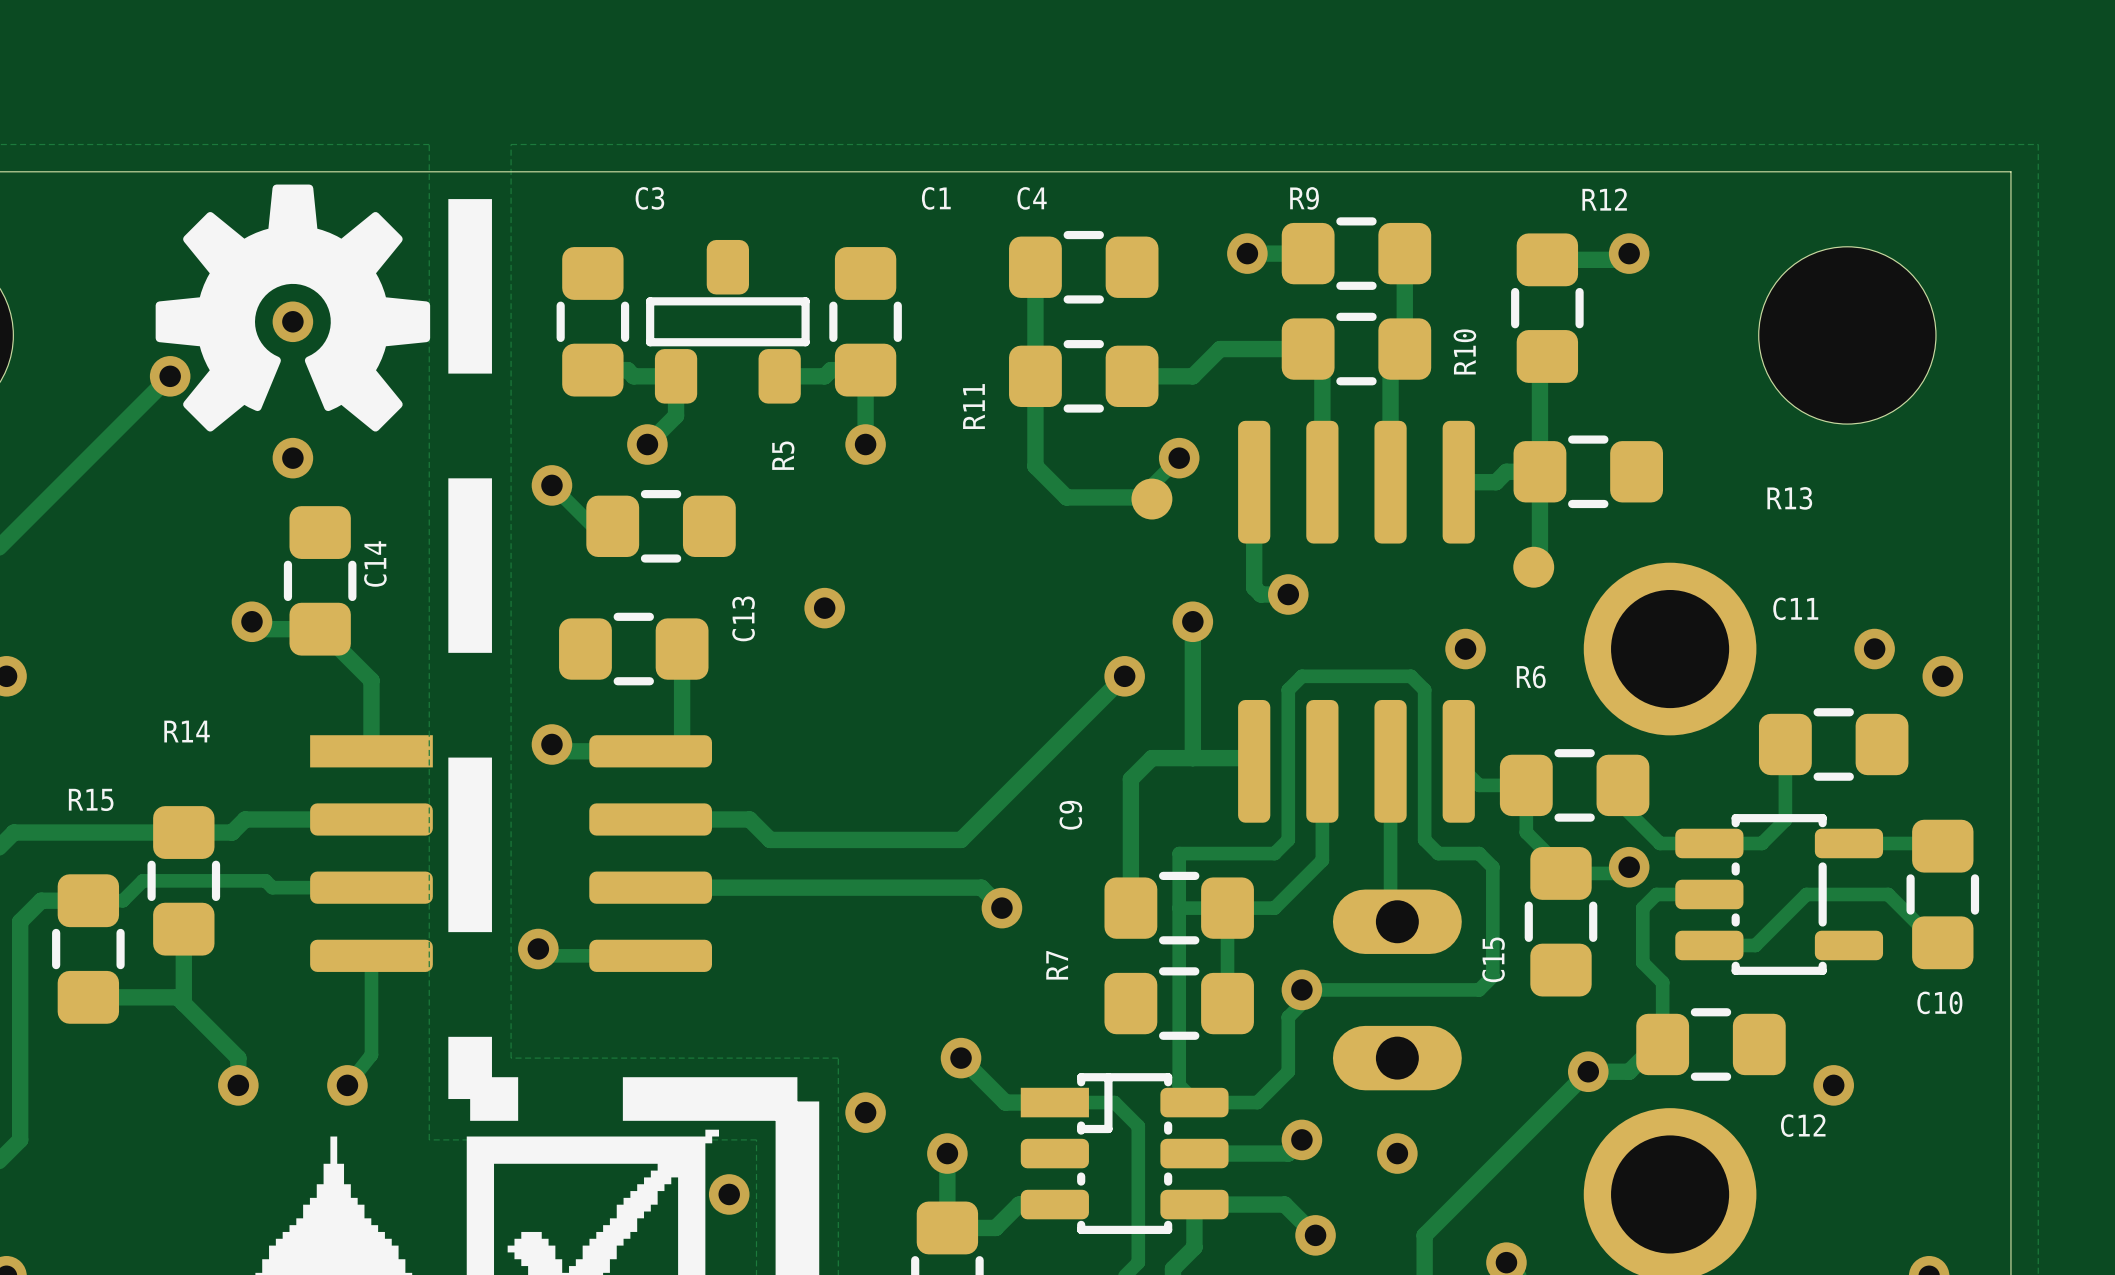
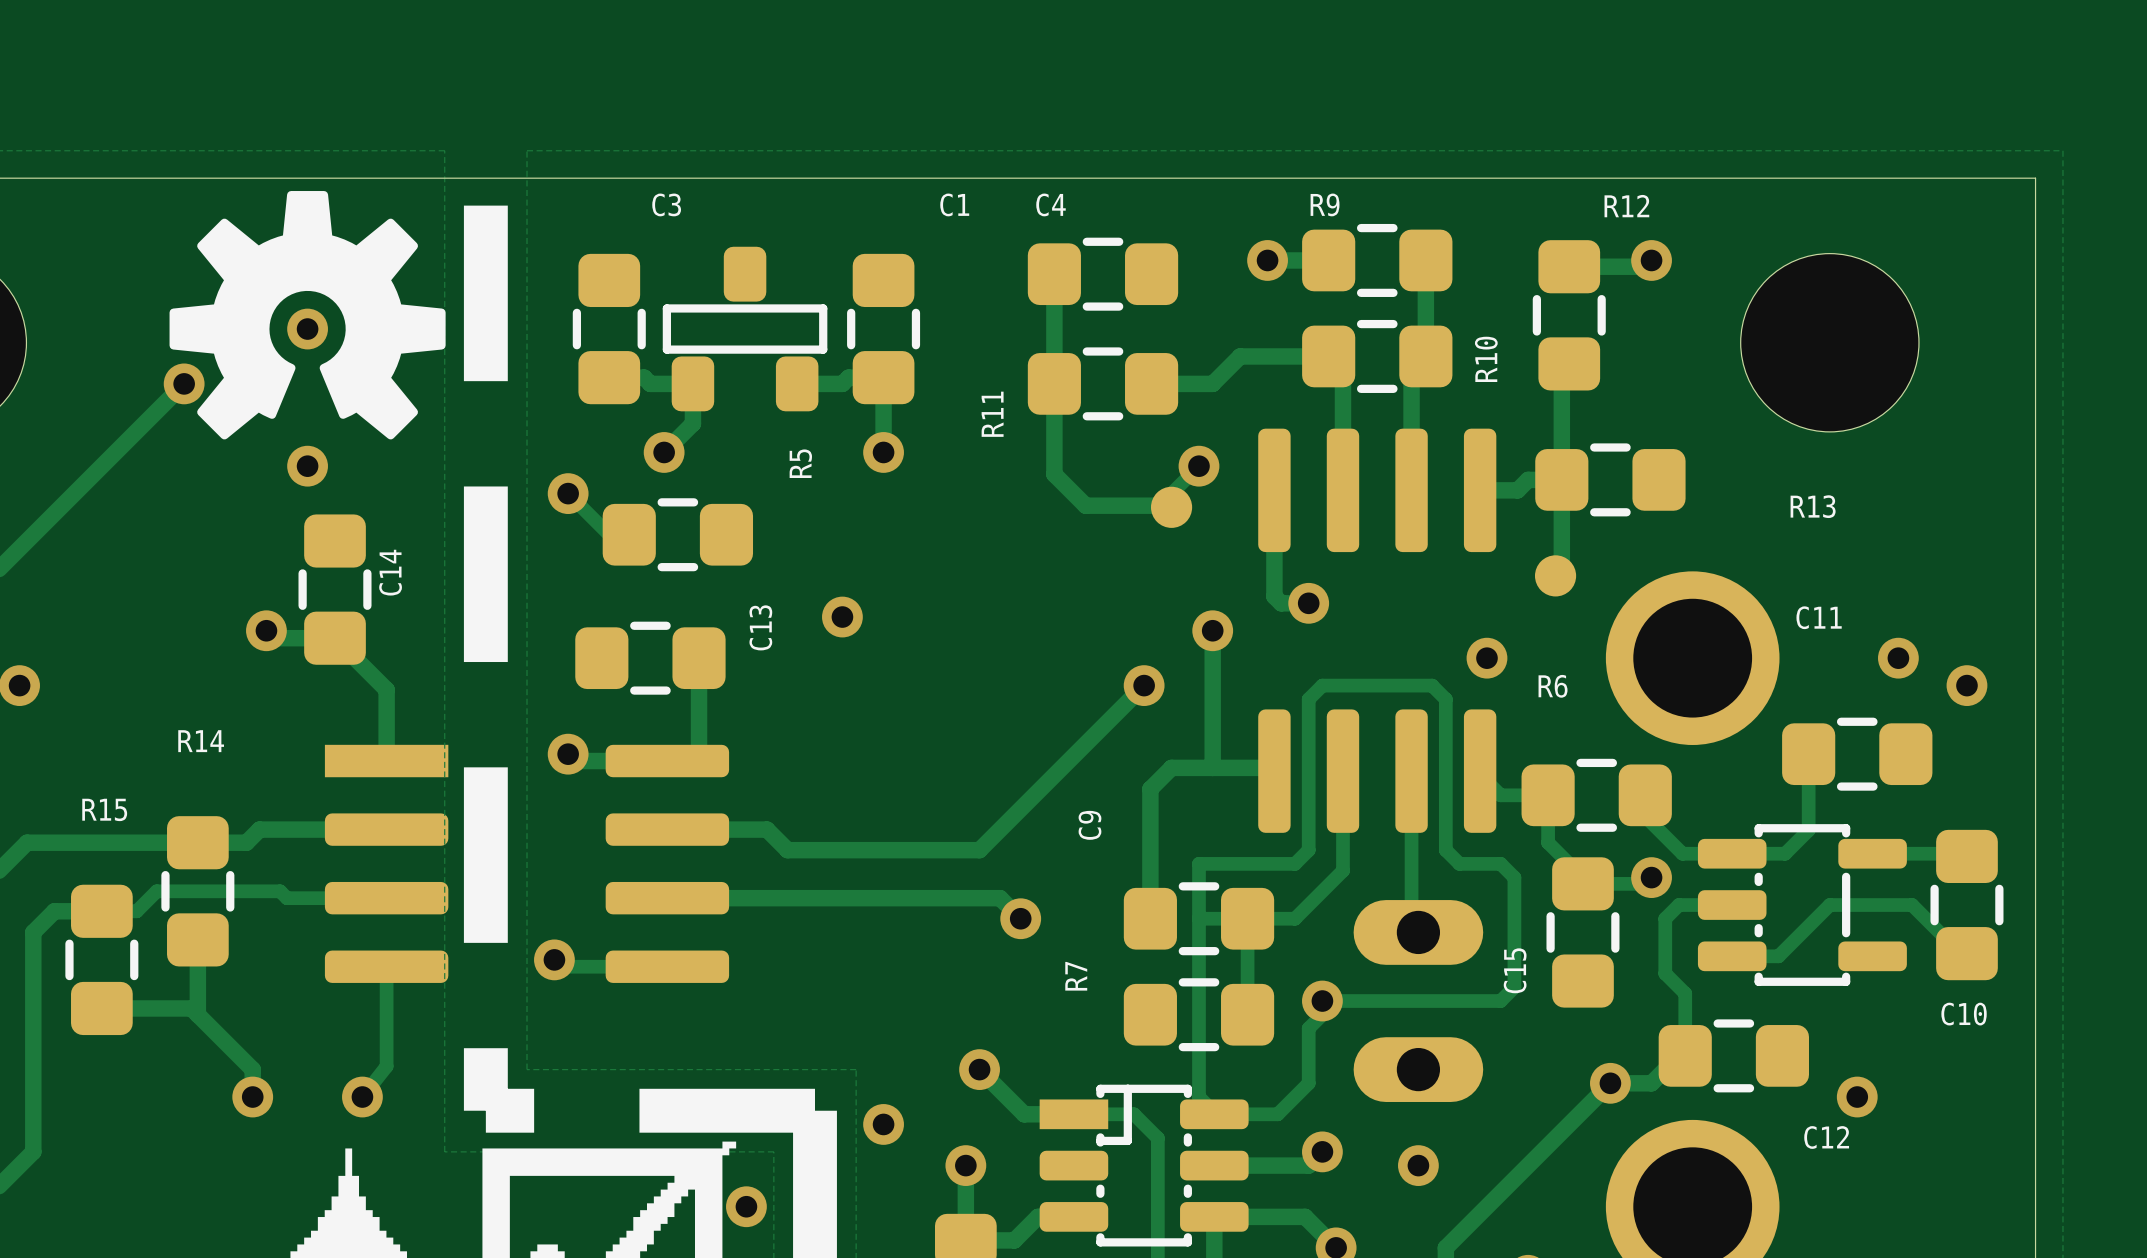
part position: (1847, 335) -> (1829, 342)

